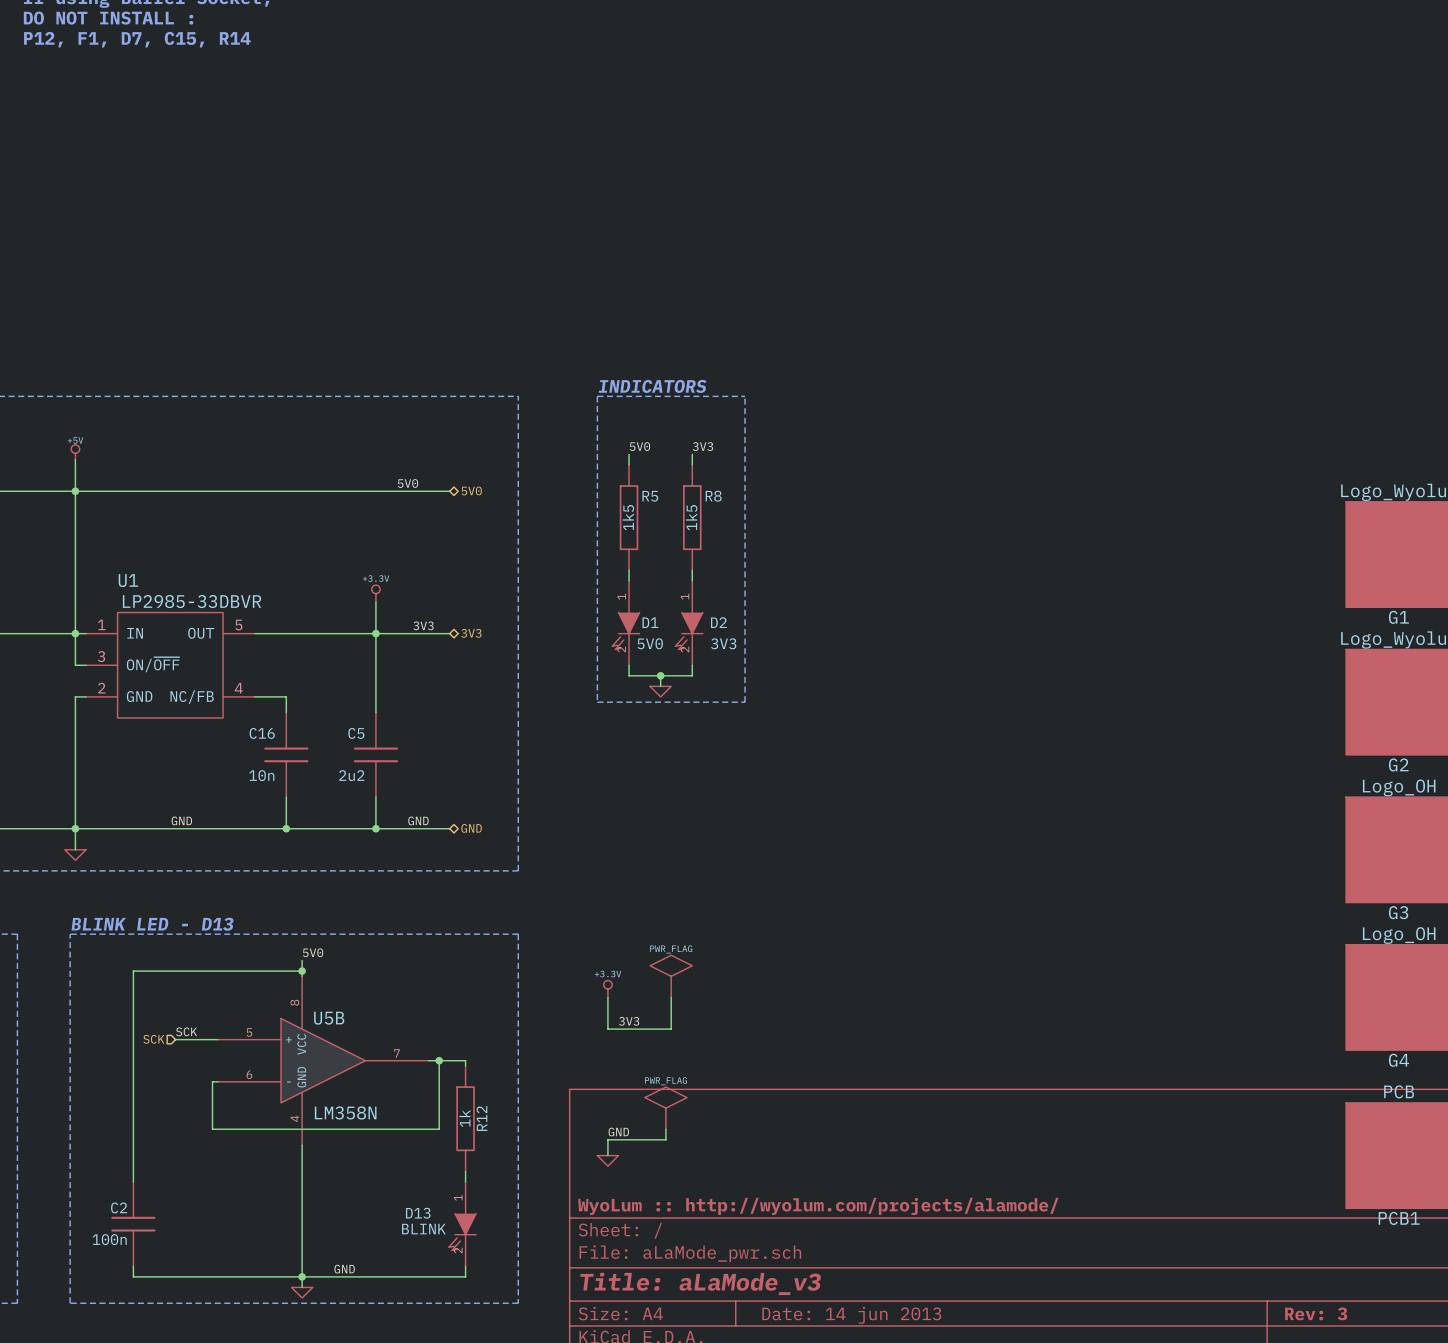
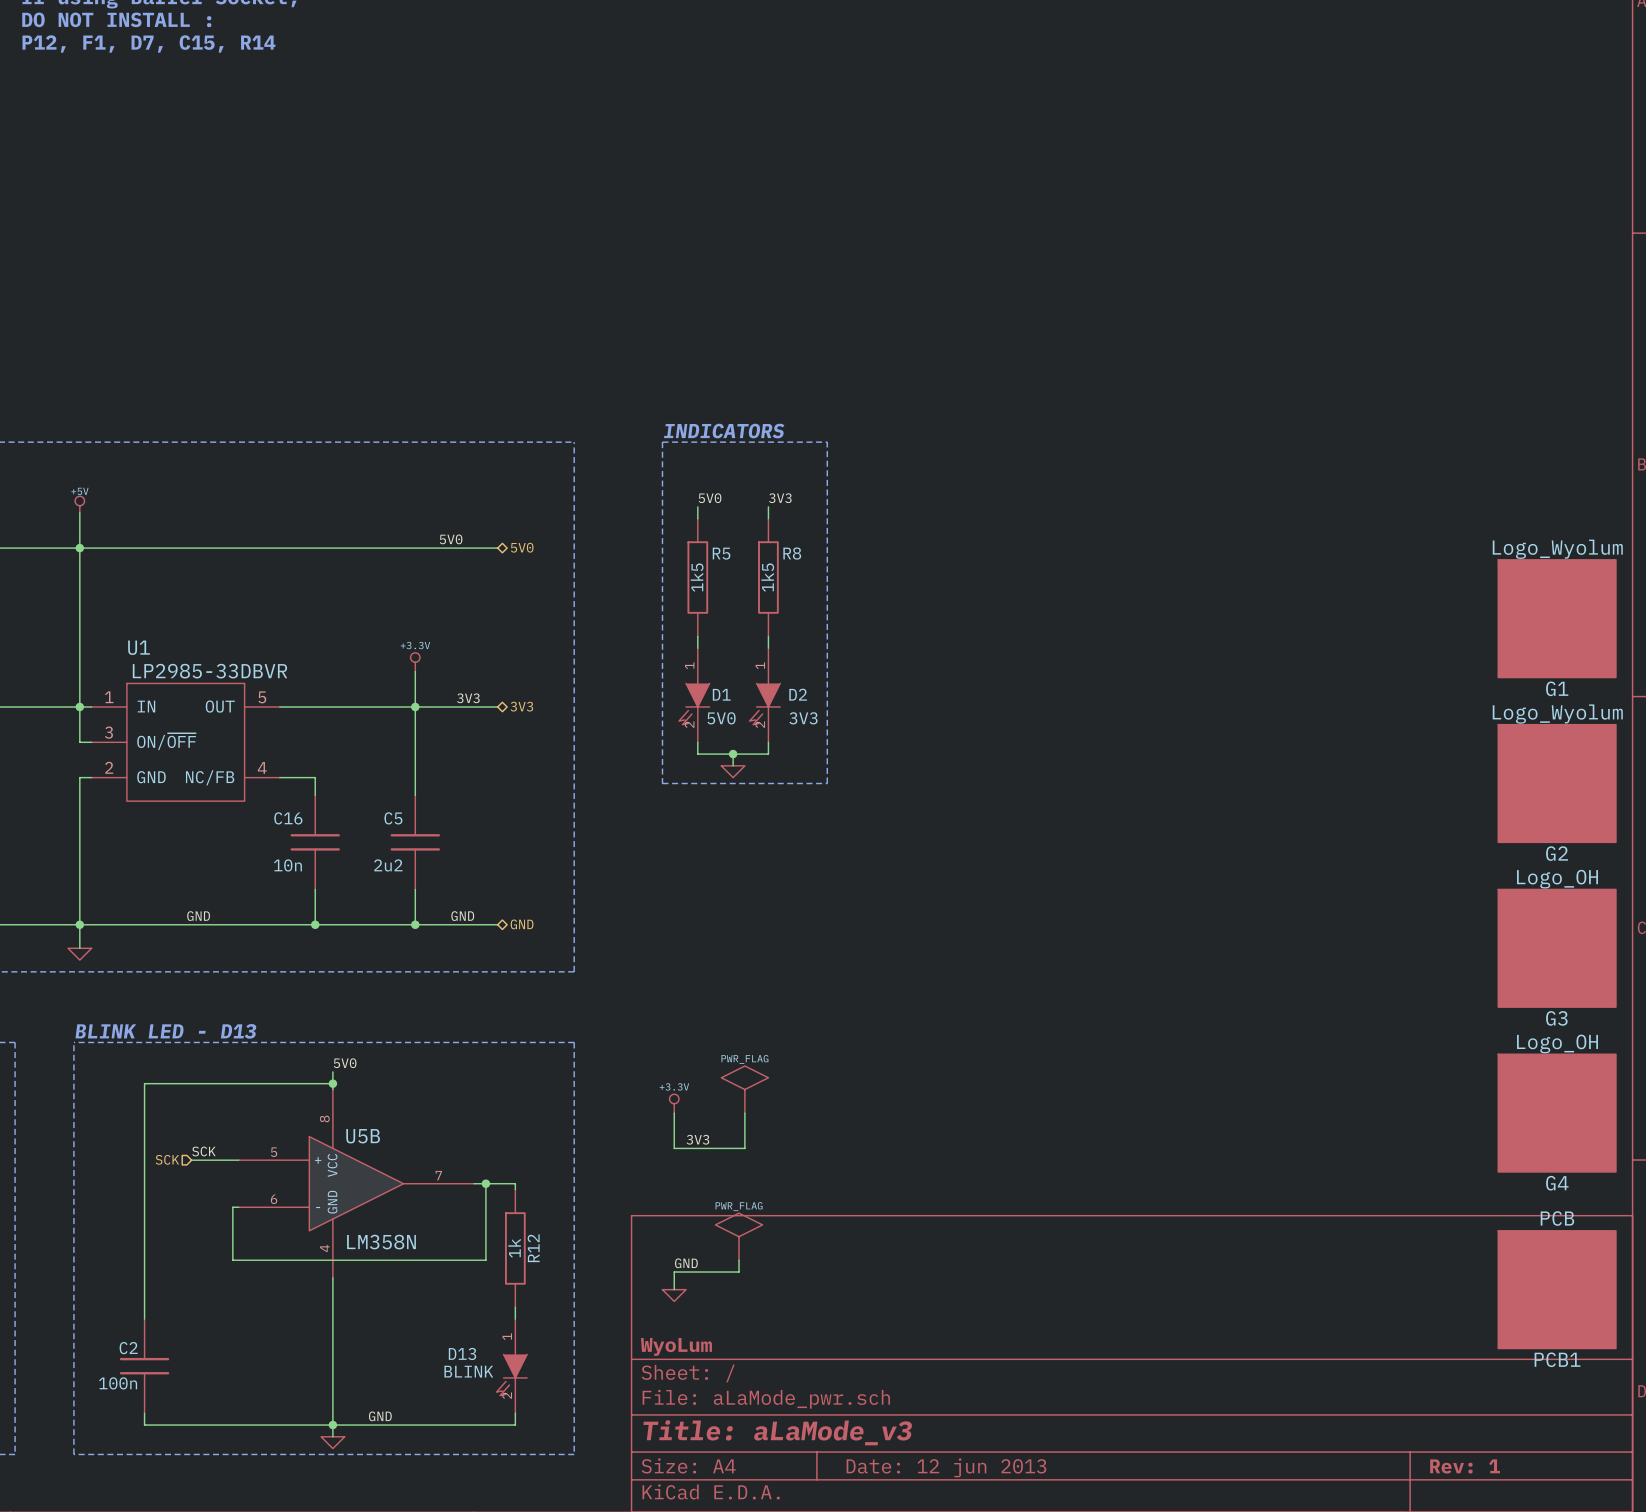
title block: WyoLum :: http://wyolum.com/projects/alamode/ (818, 1206) -> WyoLum (676, 1346)
title block: Rev: 3 (1316, 1313) -> Rev: 1 (1465, 1466)
title block: Date: 14 jun 2013 (851, 1315) -> Date: 12 jun 2013 (946, 1467)

